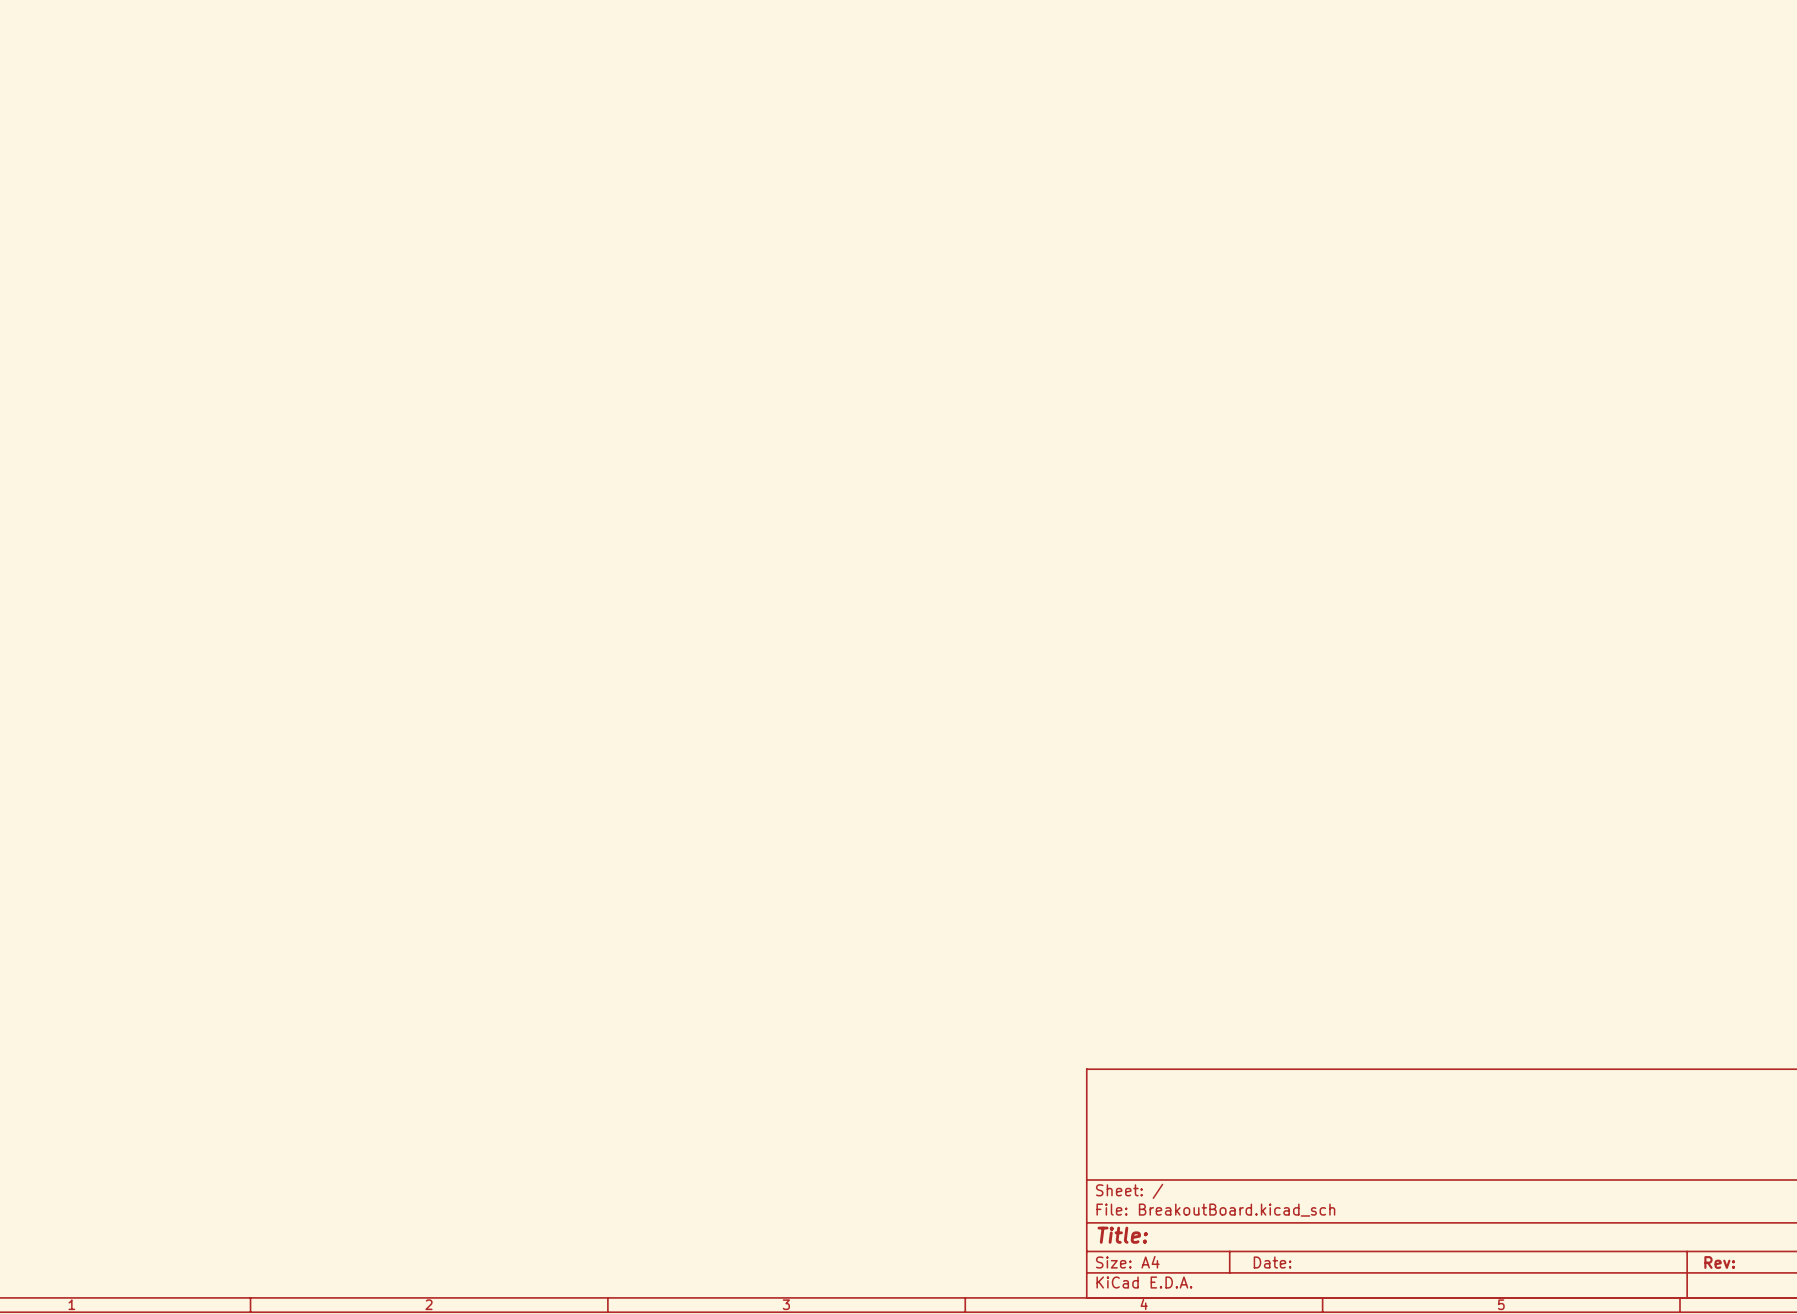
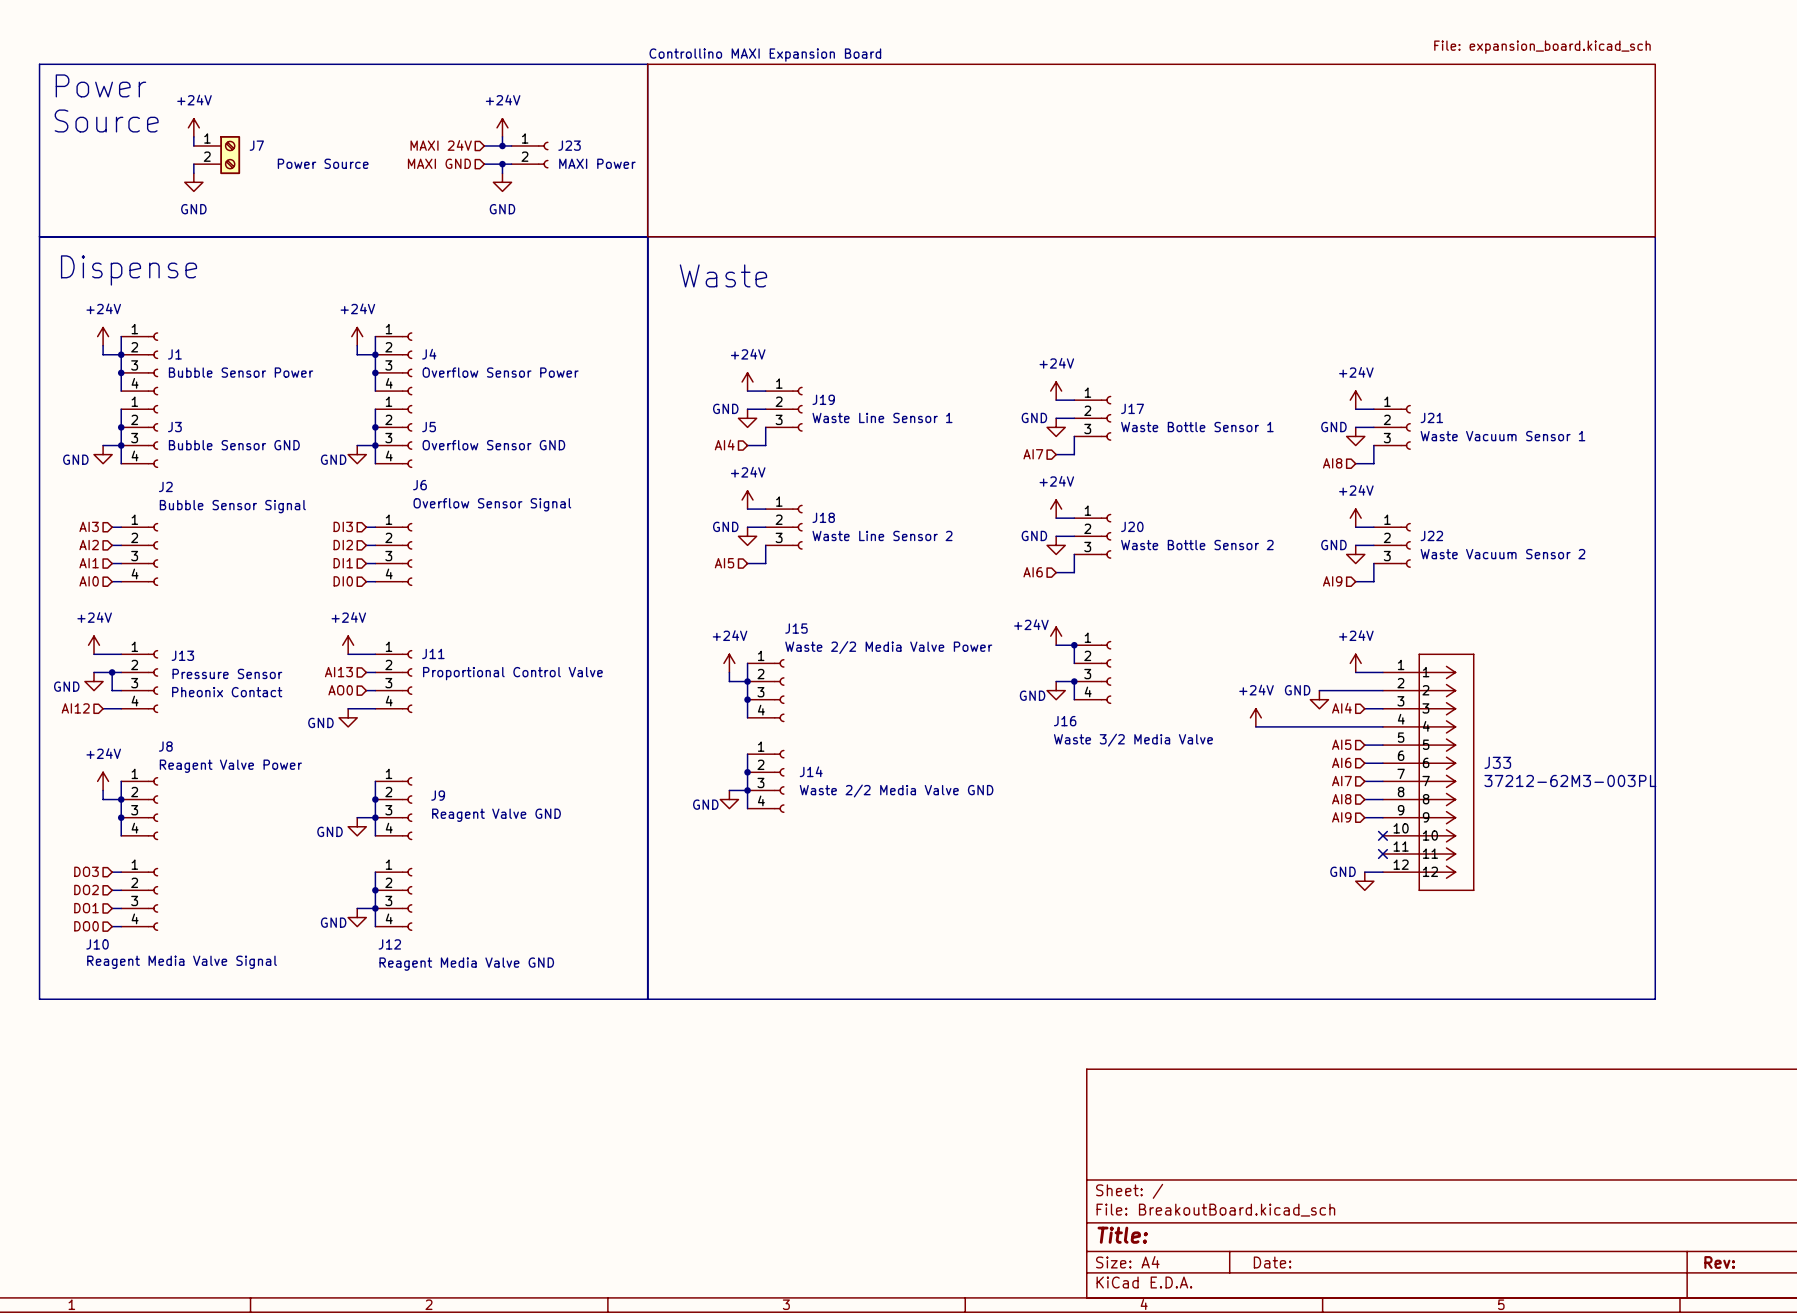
text: none -> Power (100, 85)
text: none -> Source (106, 120)
power symbol: none -> +24V (193, 127)
power symbol: none -> +24V (502, 127)
wire: none -> (193, 136) (193, 145)
wire: none -> (502, 136) (502, 145)
hierarchical label: none -> MAXI 24V (441, 145)
wire: none -> (484, 145) (511, 145)
junction: none -> (502, 145)
sheet Controllino MAXI Expansion Board: none -> File: expansion_board.kicad_sch (1151, 150)
J7: none -> Power Source (217, 155)
J23: none -> MAXI Power (529, 155)
hierarchical label: none -> MAXI GND (439, 163)
wire: none -> (193, 164) (193, 173)
wire: none -> (484, 164) (511, 164)
wire: none -> (502, 164) (502, 173)
junction: none -> (502, 164)
power symbol: none -> GND (193, 182)
power symbol: none -> GND (502, 182)
line: none -> (39, 236) (1655, 236) (1655, 999) (39, 999) (39, 64) (647, 64) (647, 999)
text: none -> Dispense (129, 270)
text: none -> Waste (723, 275)
power symbol: none -> +24V (103, 336)
wire: none -> (121, 336) (121, 391)
power symbol: none -> +24V (357, 336)
wire: none -> (375, 336) (375, 391)
wire: none -> (103, 345) (103, 354) (121, 354)
wire: none -> (357, 345) (357, 354) (375, 354)
junction: none -> (121, 354)
junction: none -> (375, 354)
J1: none -> Bubble Sensor Power (139, 363)
J4: none -> Overflow Sensor Power (393, 363)
junction: none -> (121, 372)
junction: none -> (375, 372)
power symbol: none -> +24V (747, 381)
wire: none -> (747, 391) (765, 391)
power symbol: none -> +24V (1056, 391)
wire: none -> (1056, 400) (1074, 400)
power symbol: none -> +24V (1355, 400)
wire: none -> (121, 409) (121, 463)
wire: none -> (375, 409) (375, 463)
wire: none -> (747, 409) (765, 409)
J19: none -> Waste Line Sensor 1 (784, 409)
wire: none -> (1355, 409) (1373, 409)
power symbol: none -> GND (747, 418)
wire: none -> (1056, 418) (1074, 418)
J17: none -> Waste Bottle Sensor 1 (1092, 418)
junction: none -> (121, 427)
junction: none -> (375, 427)
wire: none -> (765, 427) (765, 445) (747, 445)
power symbol: none -> GND (1056, 427)
wire: none -> (1355, 427) (1373, 427)
J21: none -> Waste Vacuum Sensor 1 (1392, 427)
J3: none -> Bubble Sensor GND (139, 436)
J5: none -> Overflow Sensor GND (393, 436)
wire: none -> (1074, 436) (1074, 454) (1056, 454)
power symbol: none -> GND (1355, 436)
hierarchical label: none -> AI4 (724, 444)
wire: none -> (103, 445) (121, 445)
junction: none -> (121, 445)
wire: none -> (357, 445) (375, 445)
junction: none -> (375, 445)
wire: none -> (1373, 445) (1373, 463) (1355, 463)
power symbol: none -> GND (103, 454)
power symbol: none -> GND (357, 454)
hierarchical label: none -> AI7 (1033, 454)
hierarchical label: none -> AI8 (1332, 463)
power symbol: none -> +24V (747, 499)
wire: none -> (747, 509) (765, 509)
power symbol: none -> +24V (1056, 509)
wire: none -> (1056, 518) (1074, 518)
power symbol: none -> +24V (1355, 518)
hierarchical label: none -> AI3 (89, 526)
hierarchical label: none -> DI3 (343, 526)
wire: none -> (112, 527) (121, 527)
wire: none -> (366, 527) (375, 527)
wire: none -> (747, 527) (765, 527)
J18: none -> Waste Line Sensor 2 (784, 527)
wire: none -> (1355, 527) (1373, 527)
power symbol: none -> GND (747, 536)
wire: none -> (1056, 536) (1074, 536)
J20: none -> Waste Bottle Sensor 2 (1092, 536)
hierarchical label: none -> AI2 (89, 545)
wire: none -> (112, 545) (121, 545)
hierarchical label: none -> DI2 (343, 545)
wire: none -> (366, 545) (375, 545)
wire: none -> (765, 545) (765, 563) (747, 563)
power symbol: none -> GND (1056, 545)
wire: none -> (1355, 545) (1373, 545)
J22: none -> Waste Vacuum Sensor 2 (1392, 545)
J2: none -> Bubble Sensor Signal (139, 554)
J6: none -> Overflow Sensor Signal (393, 554)
wire: none -> (1074, 554) (1074, 572) (1056, 572)
power symbol: none -> GND (1355, 554)
hierarchical label: none -> AI1 (89, 563)
wire: none -> (112, 563) (121, 563)
hierarchical label: none -> DI1 (343, 563)
wire: none -> (366, 563) (375, 563)
hierarchical label: none -> AI5 (724, 563)
wire: none -> (1373, 563) (1373, 581) (1355, 581)
hierarchical label: none -> AI6 (1033, 572)
hierarchical label: none -> AI0 (89, 581)
wire: none -> (112, 581) (121, 581)
hierarchical label: none -> DI0 (343, 581)
wire: none -> (366, 581) (375, 581)
hierarchical label: none -> AI9 (1332, 581)
power symbol: none -> +24V (1056, 636)
power symbol: none -> +24V (94, 645)
power symbol: none -> +24V (348, 645)
wire: none -> (1056, 645) (1074, 645) (1074, 663)
junction: none -> (1074, 645)
wire: none -> (94, 654) (121, 654)
wire: none -> (348, 654) (375, 654)
power symbol: none -> +24V (729, 663)
wire: none -> (747, 663) (747, 717)
power symbol: none -> +24V (1355, 663)
wire: none -> (94, 672) (121, 672)
wire: none -> (112, 672) (112, 690) (121, 690)
junction: none -> (112, 672)
hierarchical label: none -> AI13 (338, 672)
wire: none -> (366, 672) (375, 672)
wire: none -> (729, 672) (729, 681) (747, 681)
J16: none -> Waste 3/2 Media Valve (1092, 672)
wire: none -> (1355, 672) (1382, 672)
power symbol: none -> GND (94, 681)
J13: none -> Pressure Sensor (139, 681)
J11: none -> Proportional Control Valve (393, 681)
junction: none -> (747, 681)
wire: none -> (1056, 681) (1074, 681) (1074, 699)
junction: none -> (1074, 681)
hierarchical label: none -> AO0 (340, 690)
wire: none -> (366, 690) (375, 690)
J15: none -> Waste 2/2 Media Valve Power (765, 690)
power symbol: none -> GND (1056, 690)
wire: none -> (1319, 690) (1382, 690)
text: none -> Pheonix Contact (227, 692)
junction: none -> (747, 699)
power symbol: none -> GND (1319, 699)
hierarchical label: none -> AI12 (75, 708)
wire: none -> (103, 708) (121, 708)
wire: none -> (348, 708) (375, 708)
hierarchical label: none -> AI4 (1341, 708)
wire: none -> (1364, 708) (1382, 708)
power symbol: none -> GND (348, 717)
power symbol: none -> +24V (1255, 717)
wire: none -> (1255, 726) (1382, 726)
hierarchical label: none -> AI5 (1341, 744)
wire: none -> (1364, 745) (1382, 745)
wire: none -> (747, 754) (747, 808)
hierarchical label: none -> AI6 (1341, 762)
wire: none -> (1364, 763) (1382, 763)
junction: none -> (747, 772)
J33: none -> 37212-62M3-003PL (1428, 772)
power symbol: none -> +24V (103, 781)
wire: none -> (121, 781) (121, 835)
wire: none -> (375, 781) (375, 835)
J14: none -> Waste 2/2 Media Valve GND (765, 781)
hierarchical label: none -> AI7 (1341, 781)
wire: none -> (1364, 781) (1382, 781)
wire: none -> (103, 790) (103, 799) (121, 799)
wire: none -> (729, 790) (747, 790)
junction: none -> (747, 790)
junction: none -> (121, 799)
junction: none -> (375, 799)
power symbol: none -> GND (729, 799)
hierarchical label: none -> AI8 (1341, 799)
wire: none -> (1364, 799) (1382, 799)
J8: none -> Reagent Valve Power (139, 808)
J9: none -> Reagent Valve GND (393, 808)
junction: none -> (121, 817)
wire: none -> (357, 817) (375, 817)
junction: none -> (375, 817)
hierarchical label: none -> AI9 (1341, 817)
wire: none -> (1364, 817) (1382, 817)
power symbol: none -> GND (357, 826)
no-connect mark: none -> (1382, 835)
no-connect mark: none -> (1382, 854)
hierarchical label: none -> DO3 (86, 871)
wire: none -> (112, 872) (121, 872)
wire: none -> (375, 872) (375, 926)
wire: none -> (1364, 872) (1382, 872)
power symbol: none -> GND (1364, 881)
hierarchical label: none -> DO2 (86, 889)
wire: none -> (112, 890) (121, 890)
junction: none -> (375, 890)
J10: none -> Reagent Media Valve Signal (139, 899)
J12: none -> Reagent Media Valve GND (393, 899)
hierarchical label: none -> DO1 (86, 908)
wire: none -> (112, 908) (121, 908)
wire: none -> (357, 908) (375, 908)
junction: none -> (375, 908)
power symbol: none -> GND (357, 917)
hierarchical label: none -> DO0 (86, 926)
wire: none -> (112, 926) (121, 926)

